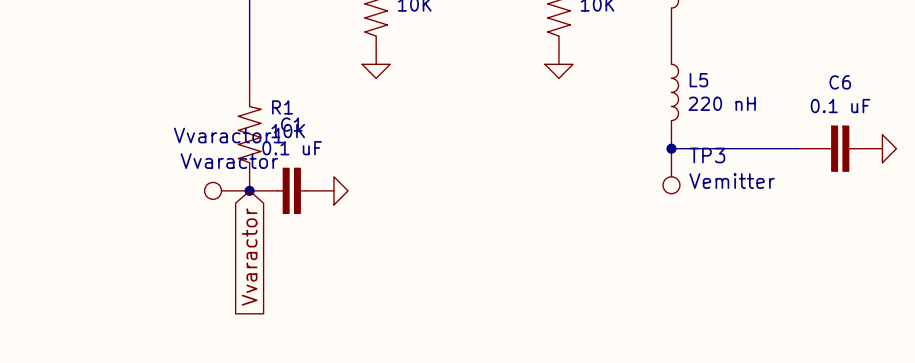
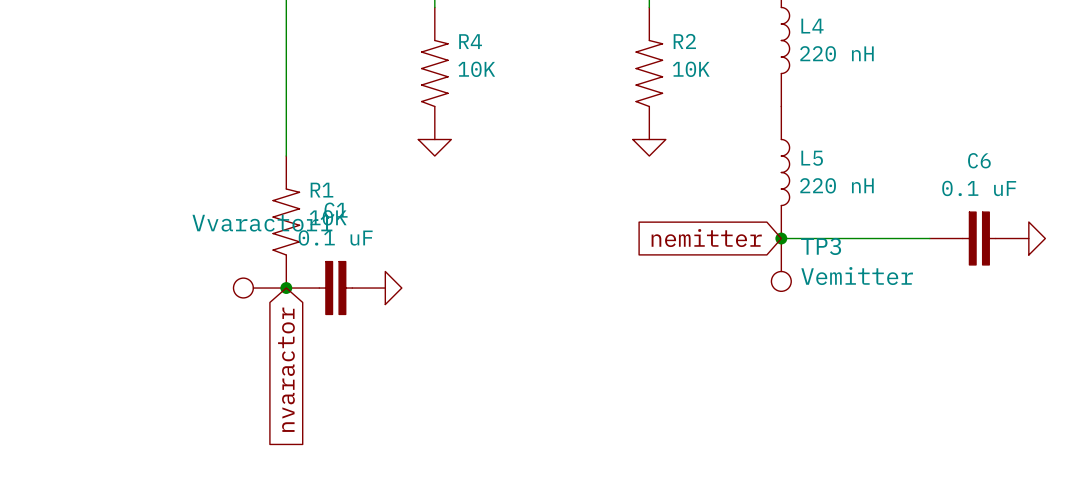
global label: none -> nemitter (706, 238)
Vvaractor1 value: Vvaractor (229, 161) -> none
global label: Vvaractor (249, 257) -> nvaractor (286, 369)

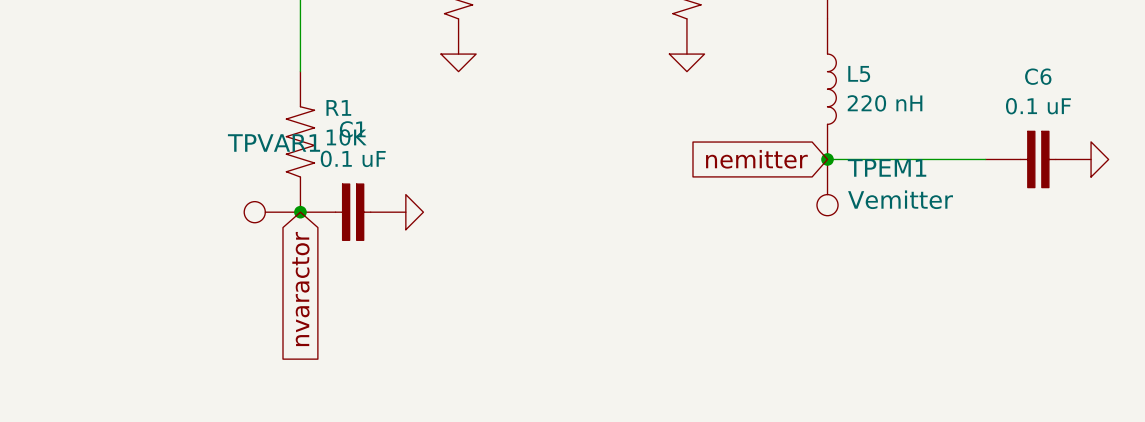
Vvaractor1 name: Vvaractor1 (262, 223) -> TPVAR1 (273, 143)
TP3 name: TP3 (821, 246) -> TPEM1 (887, 167)

